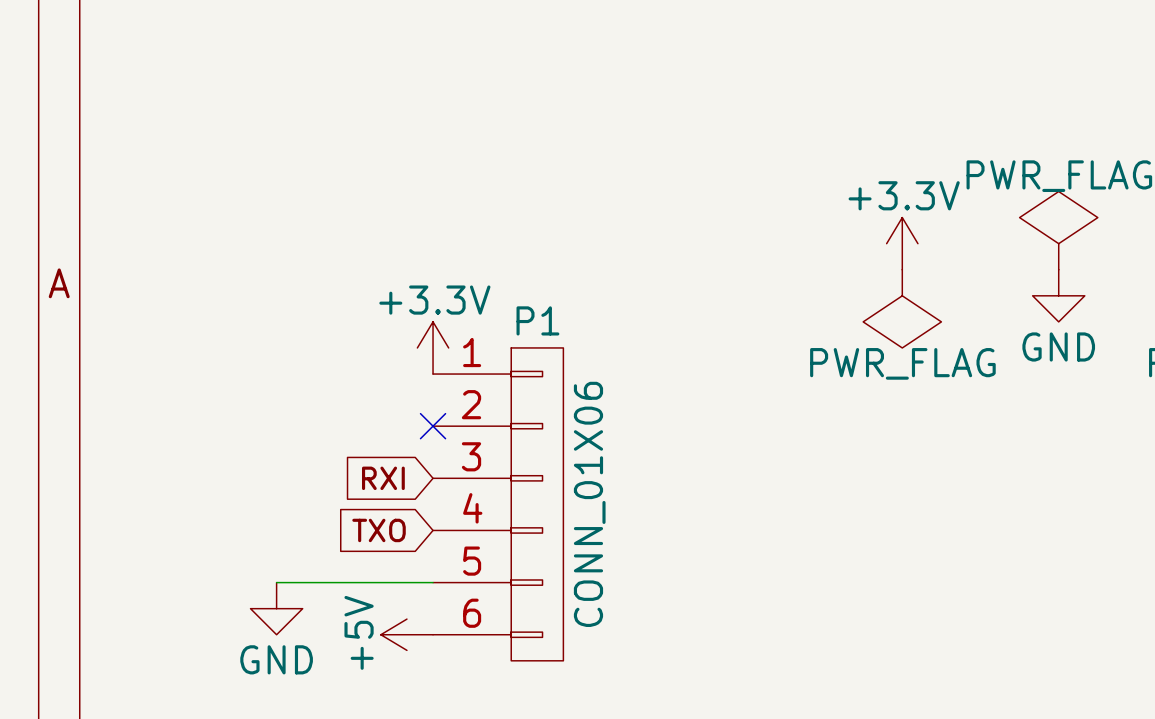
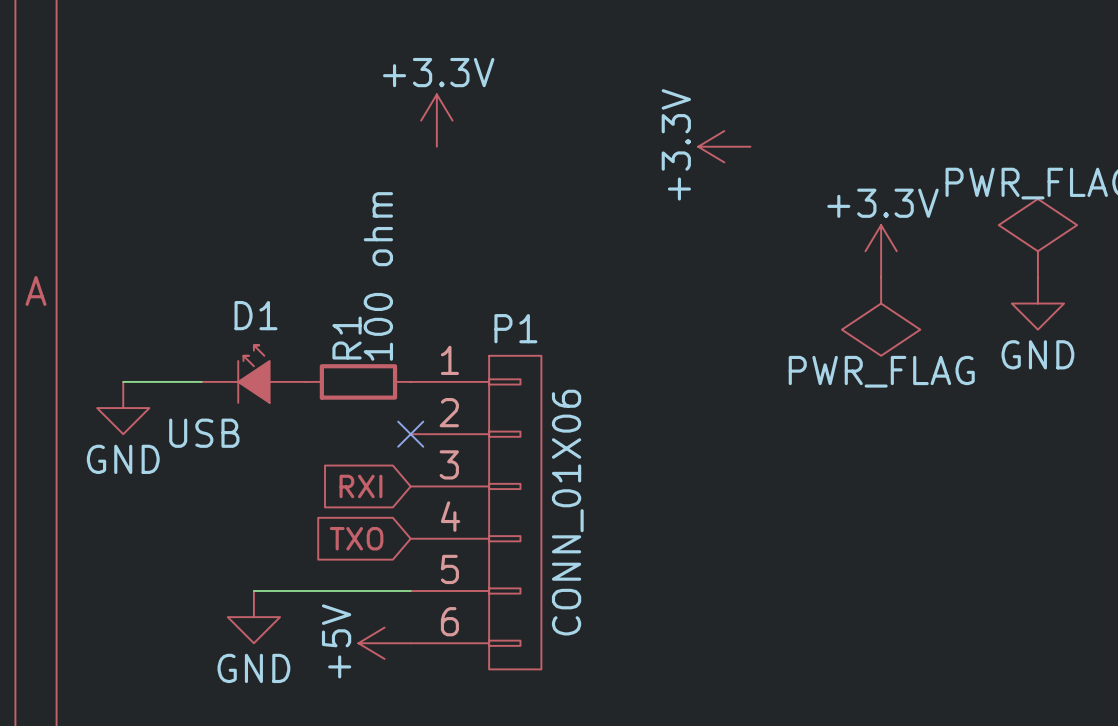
power symbol: none -> +3.3V (436, 120)
power symbol: none -> +3.3V (724, 146)
power symbol: +3.3V (433, 347) -> none
D1: none -> USB (253, 374)
wire: none -> (123, 381) (201, 381)
R1: none -> 100 ohm (358, 381)
power symbol: none -> GND (123, 408)

